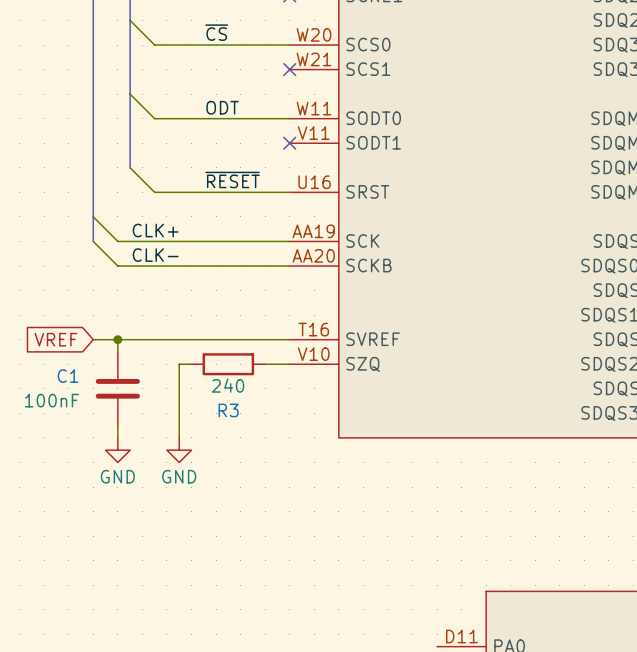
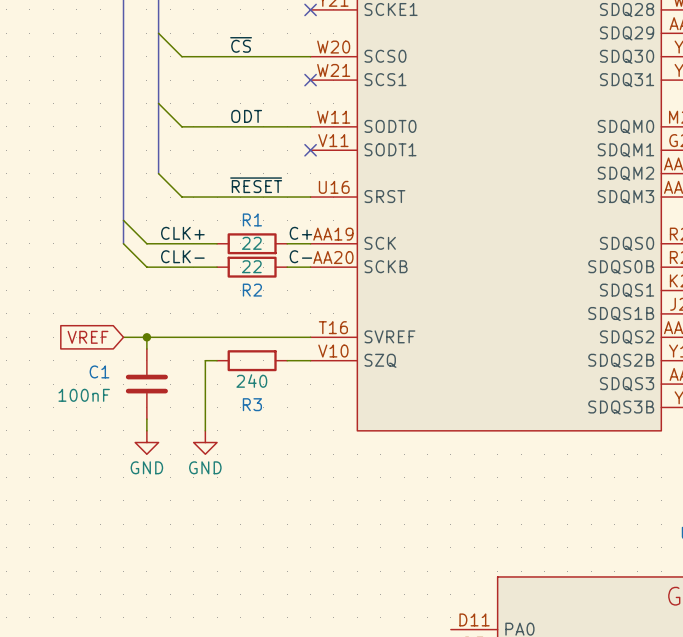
label: none -> C+ (300, 233)
wire: (191, 241) (265, 241) -> none
R1: none -> 22 (252, 243)
label: none -> C- (300, 256)
wire: (191, 266) (265, 266) -> none
R2: none -> 22 (252, 267)

